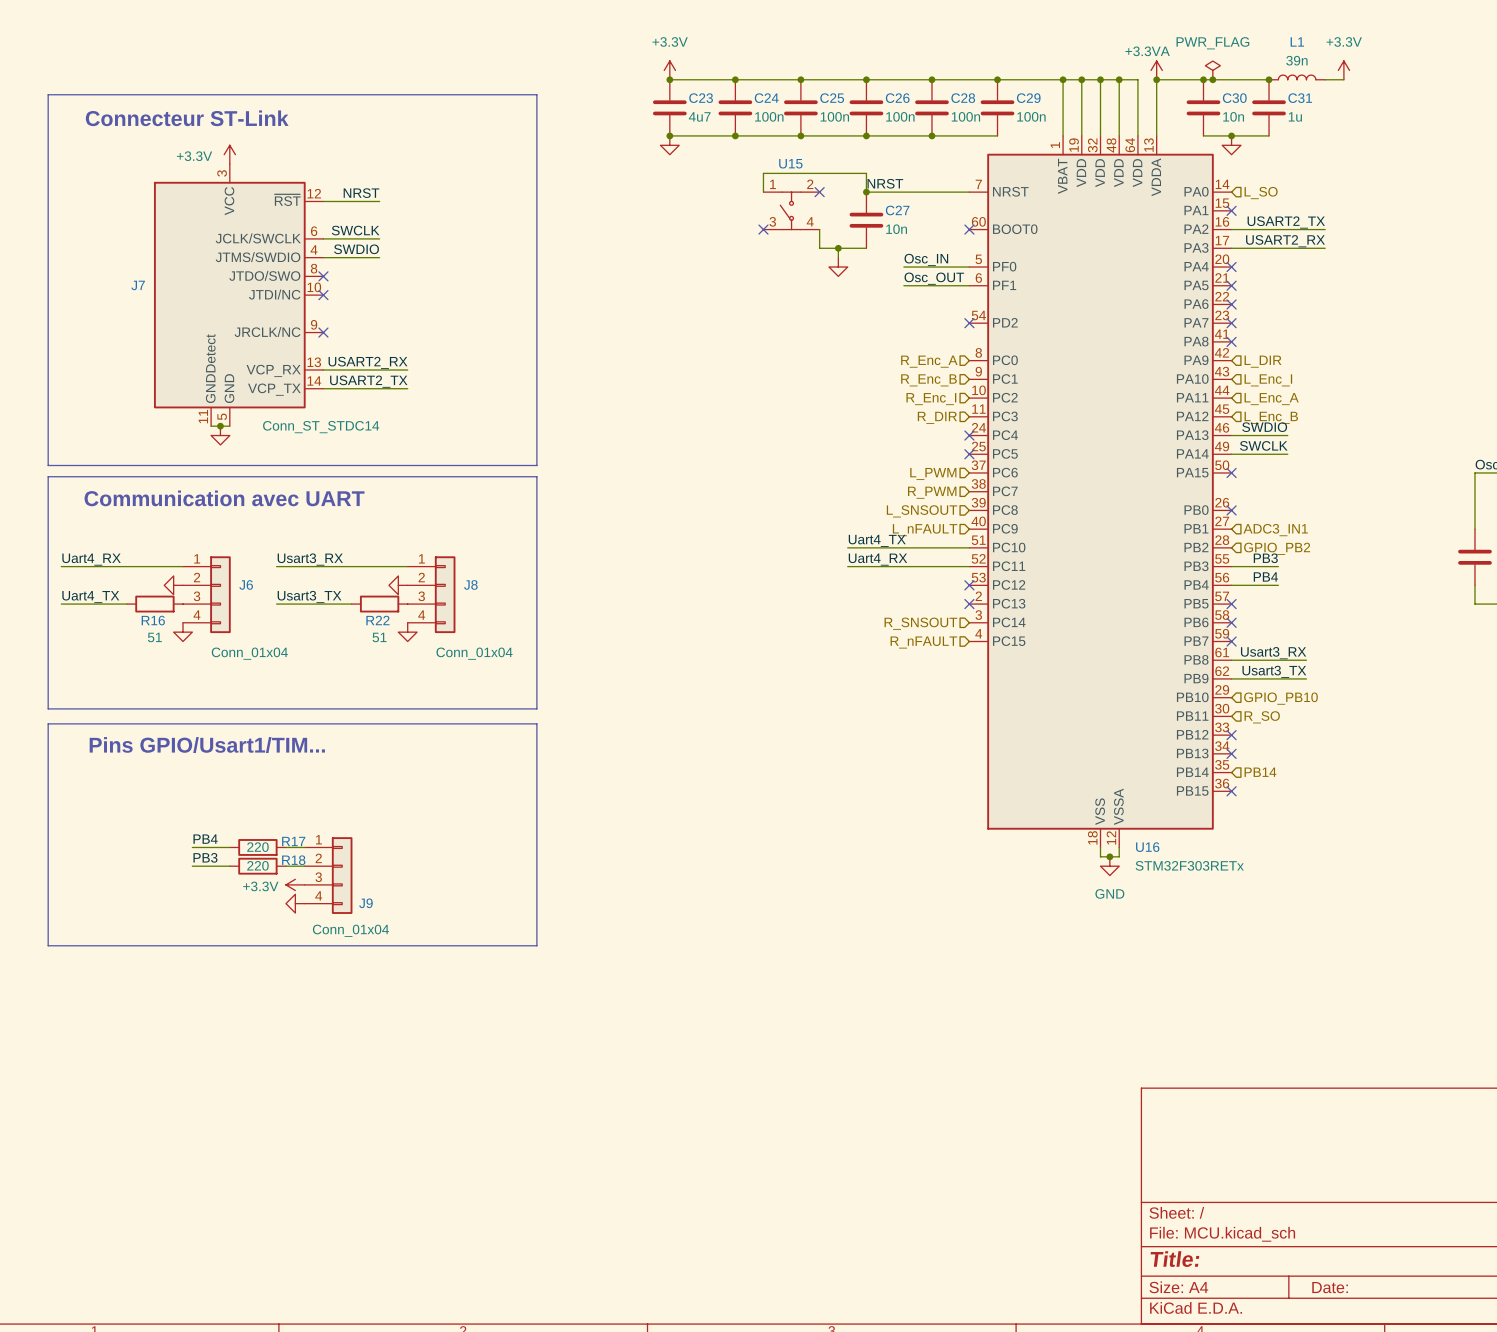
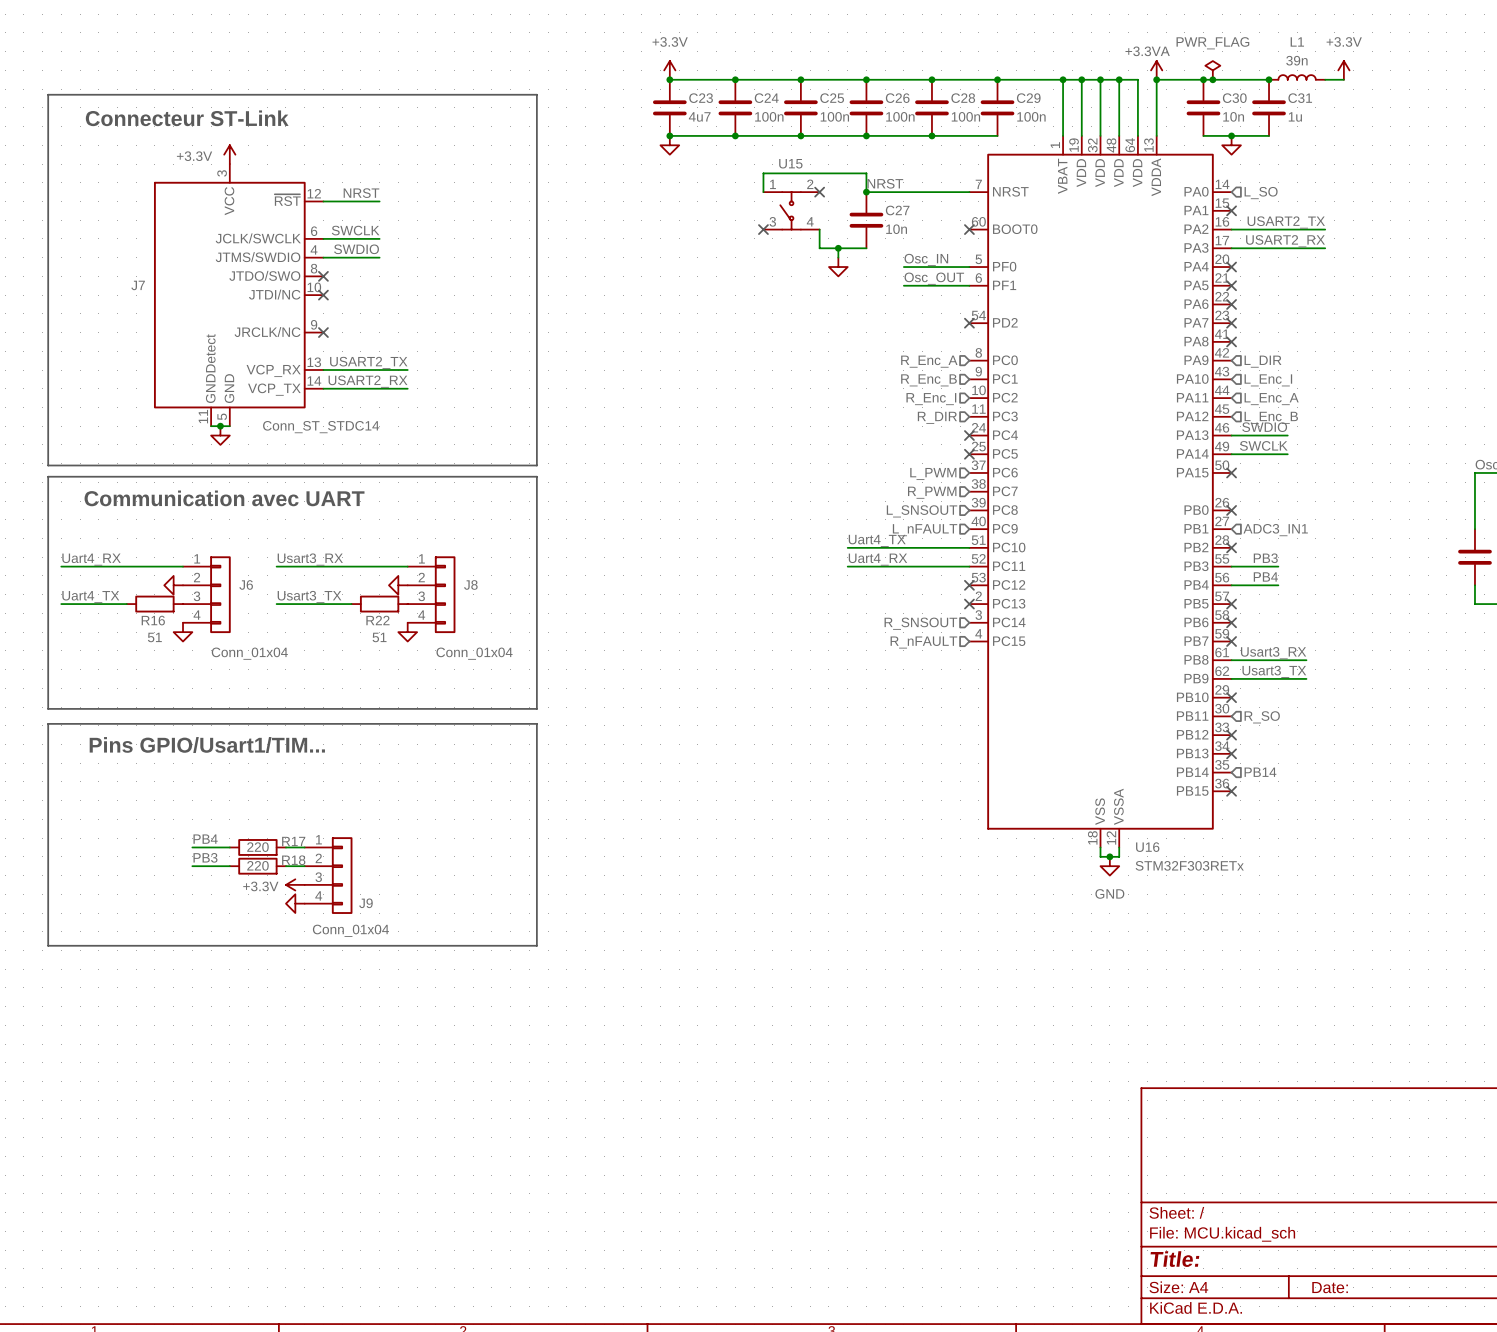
label: USART2_RX (367, 362) -> USART2_TX (368, 362)
label: USART2_TX (368, 381) -> USART2_RX (367, 381)
no-connect mark: none -> (1231, 547)
hierarchical label: GPIO_PB2 (1277, 548) -> none
no-connect mark: none -> (1231, 697)
hierarchical label: GPIO_PB10 (1280, 698) -> none

